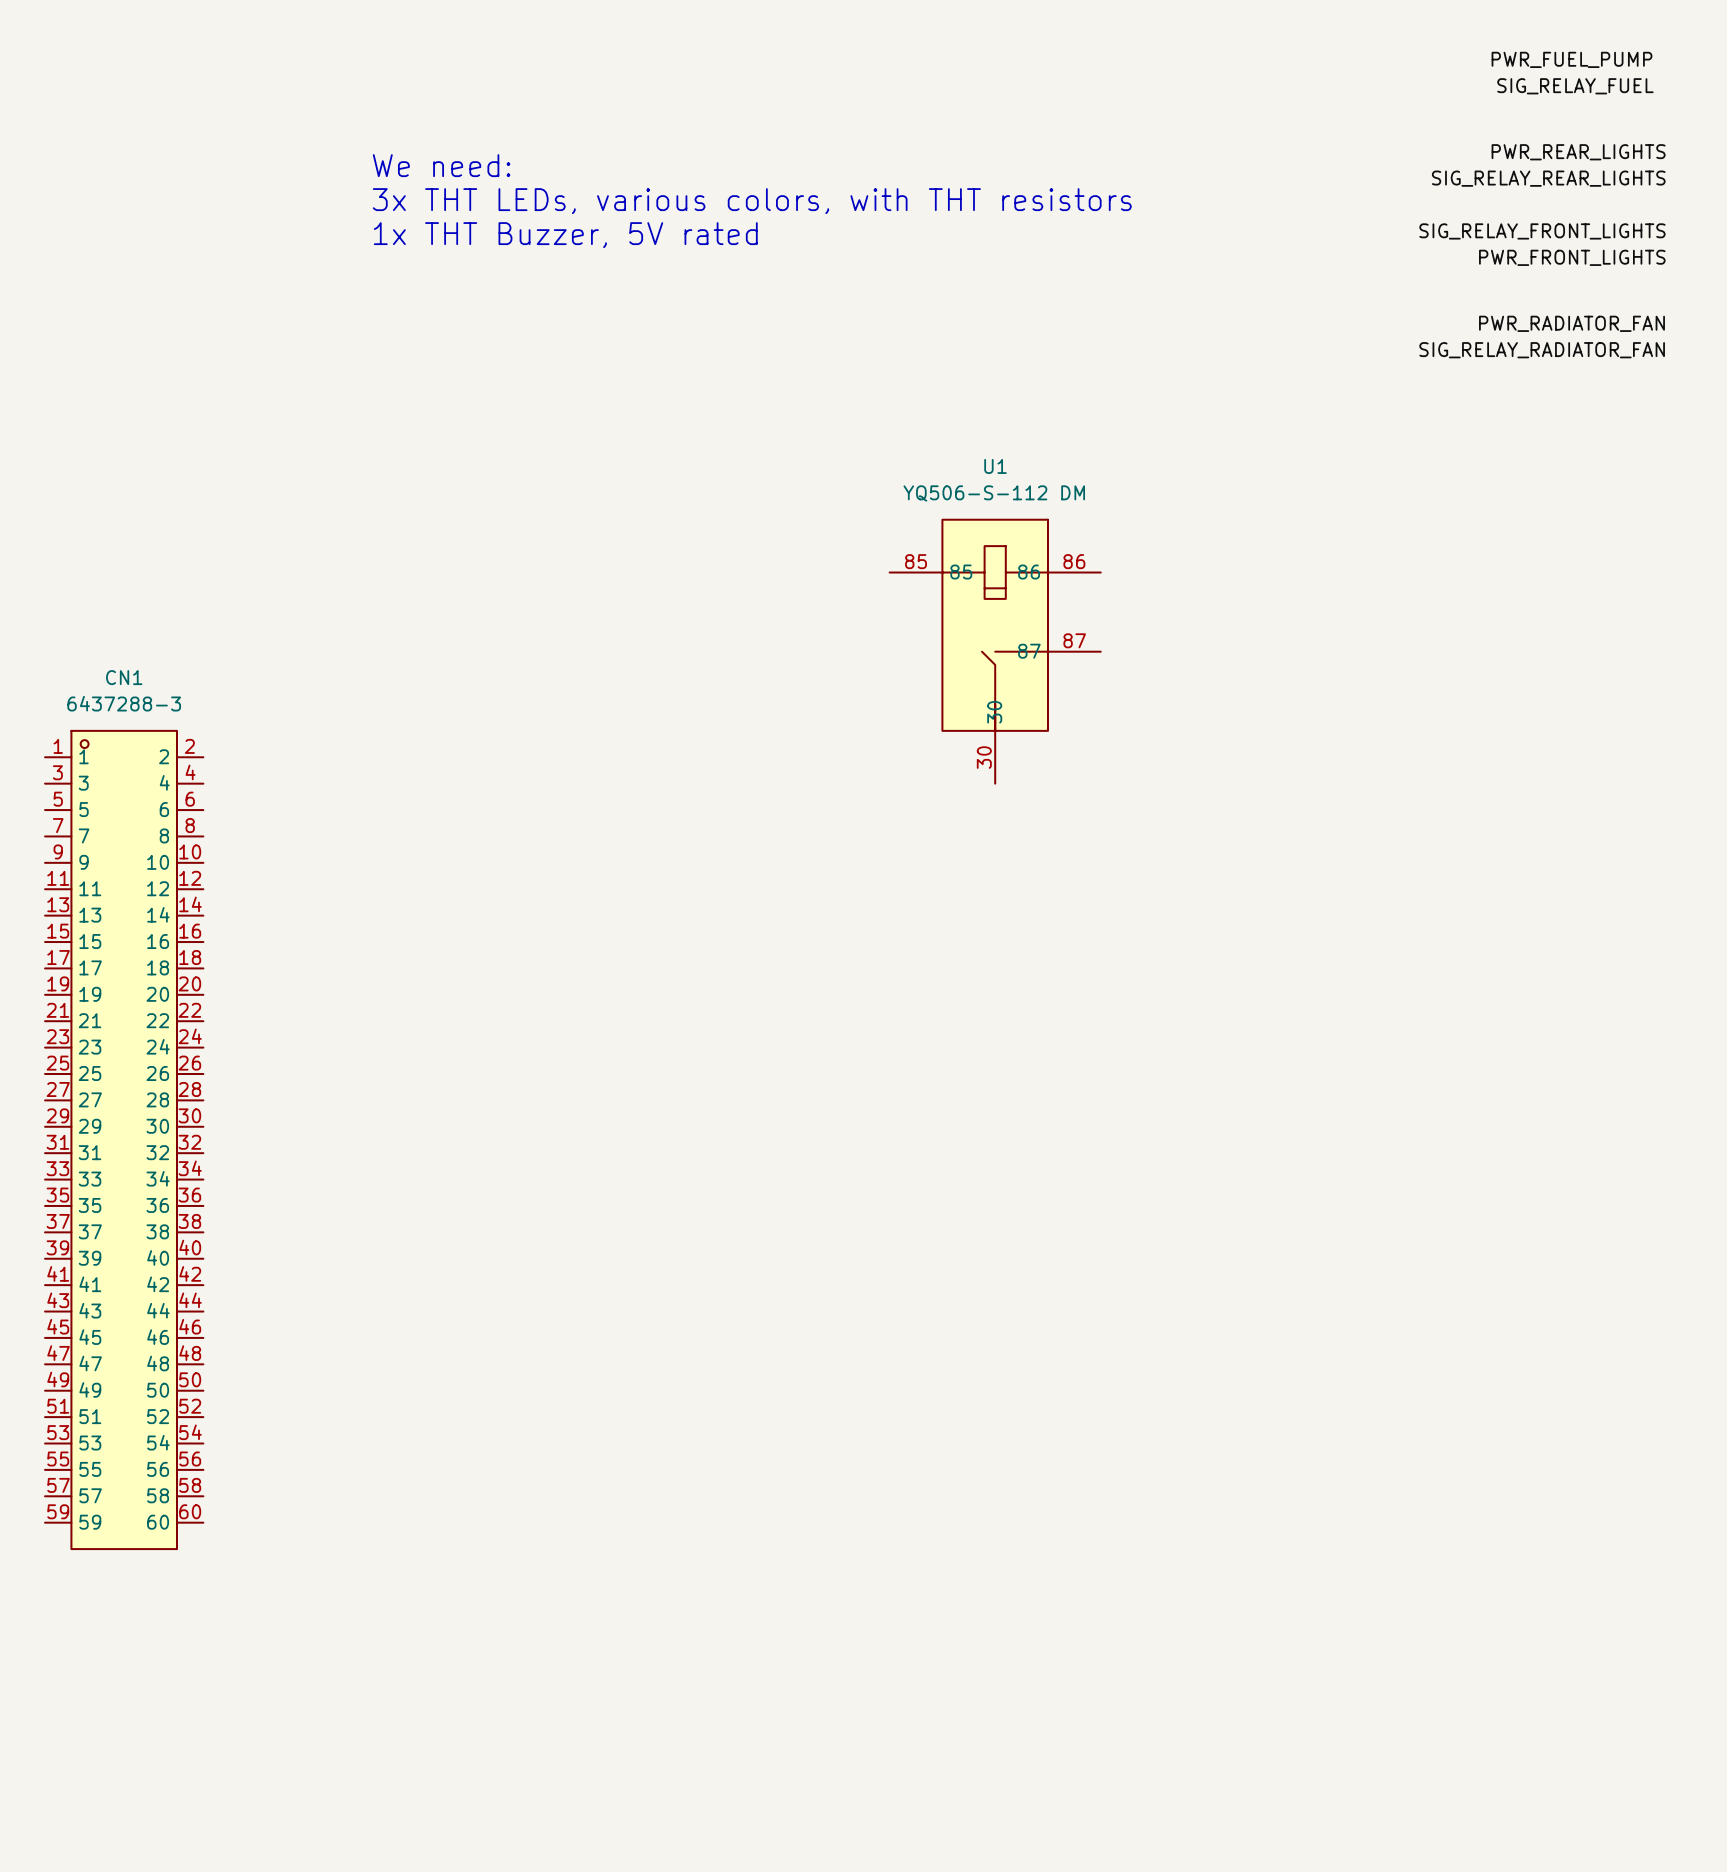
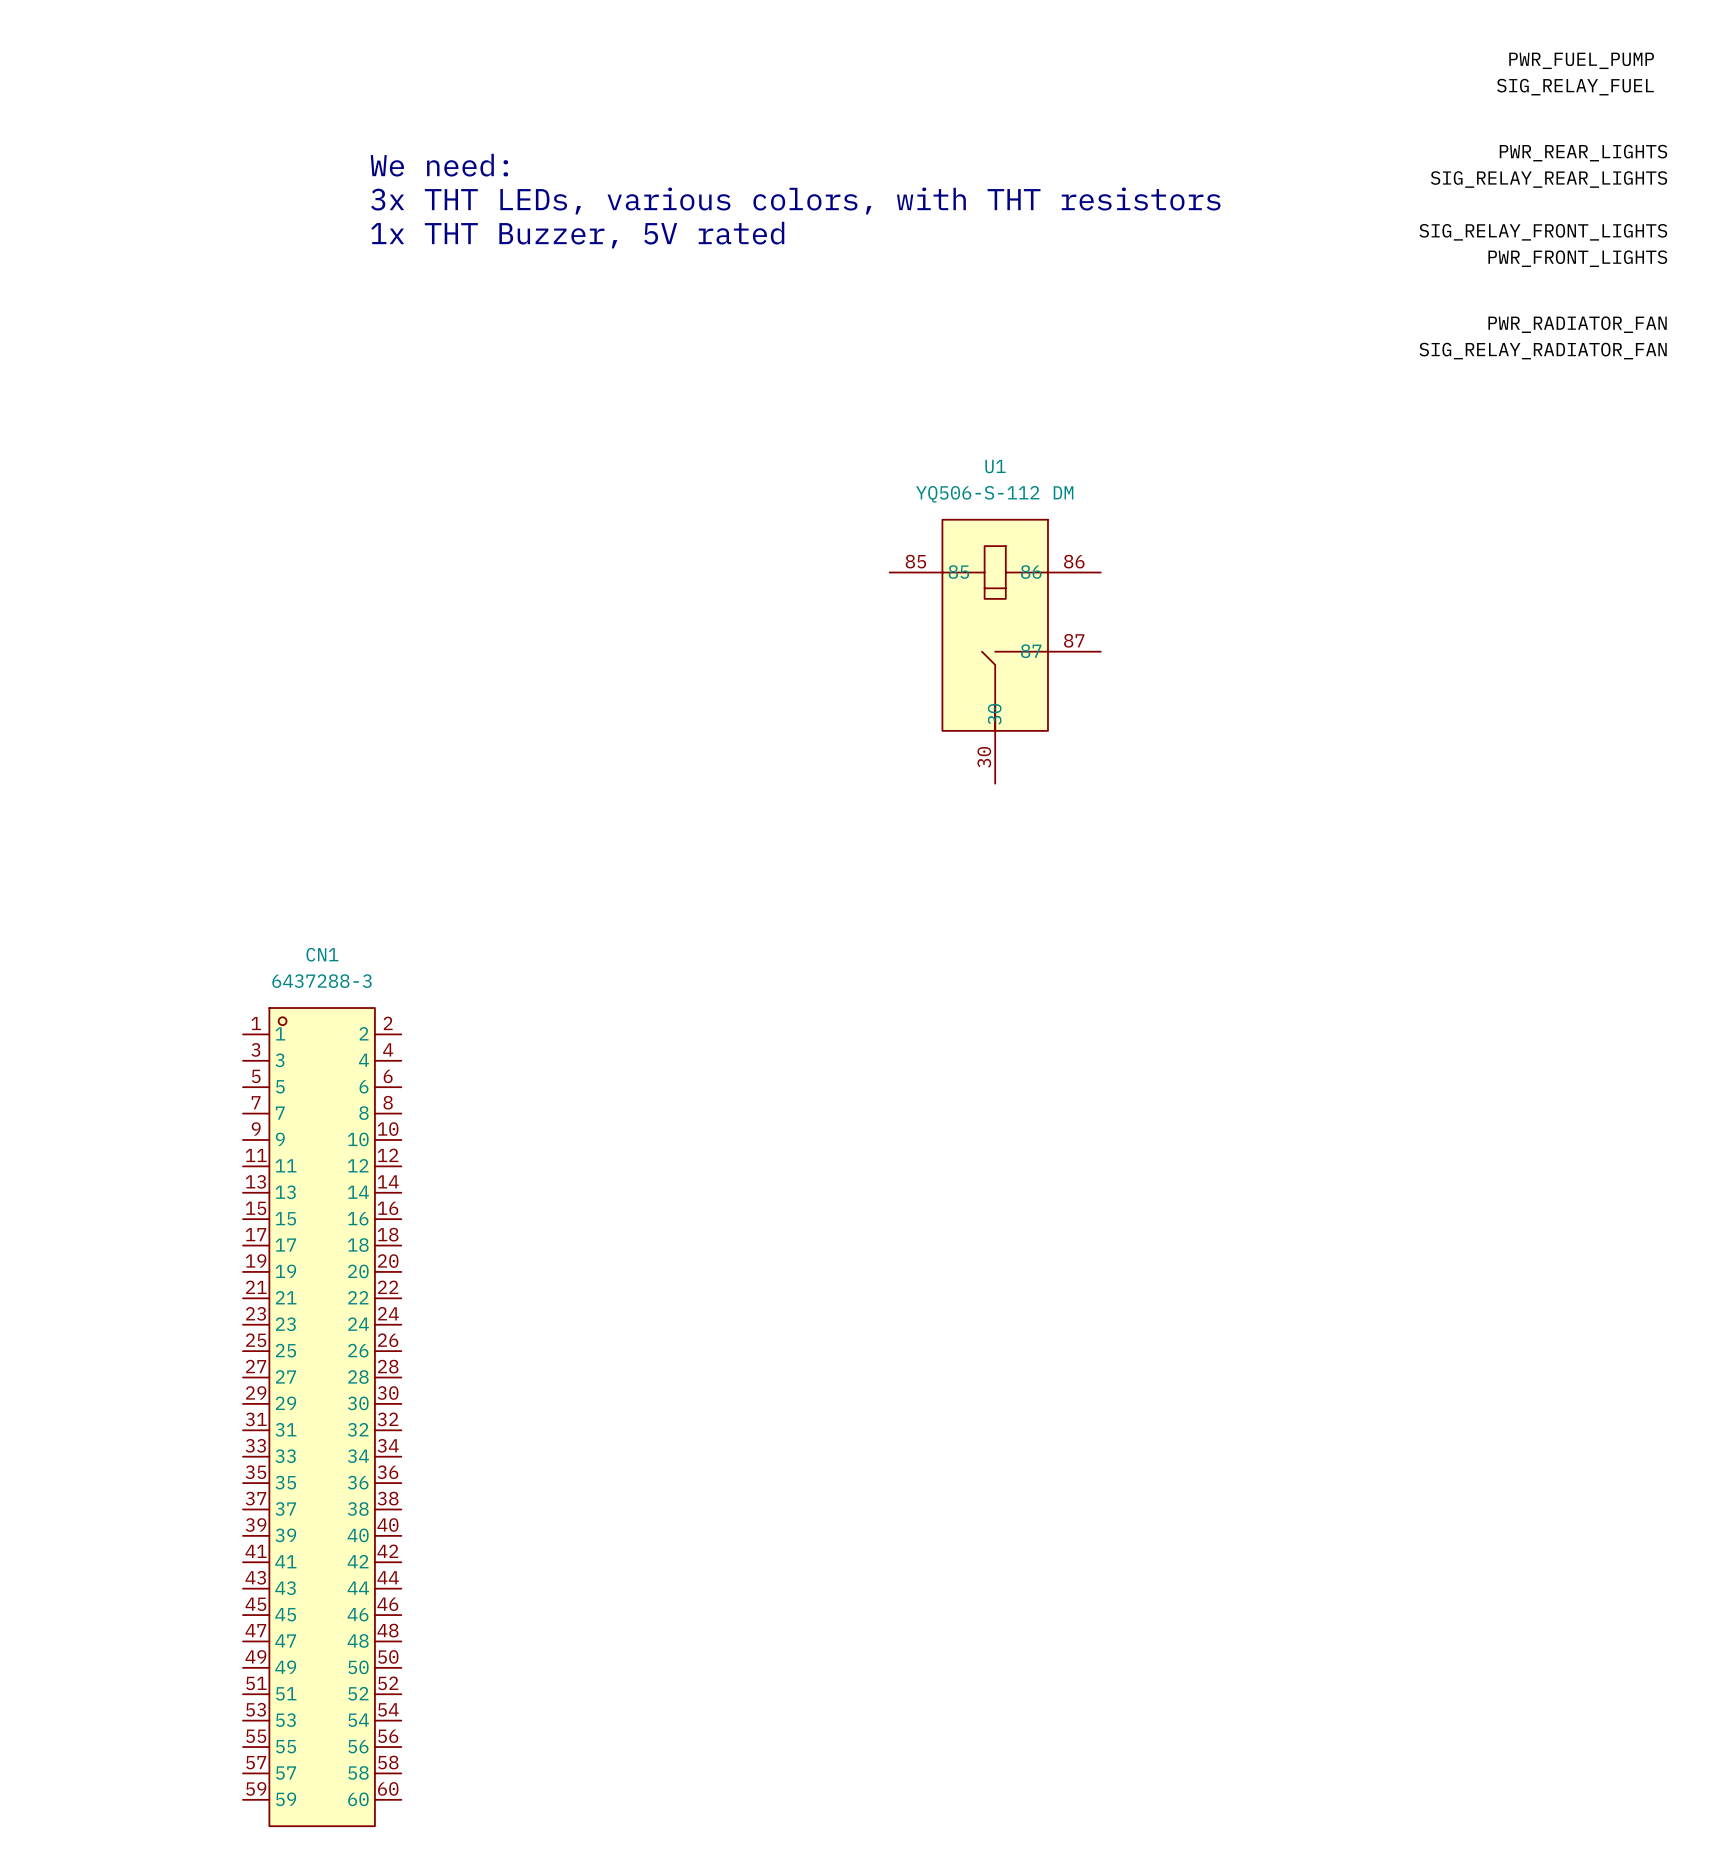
CN1 position: (124, 1139) -> (322, 1417)

